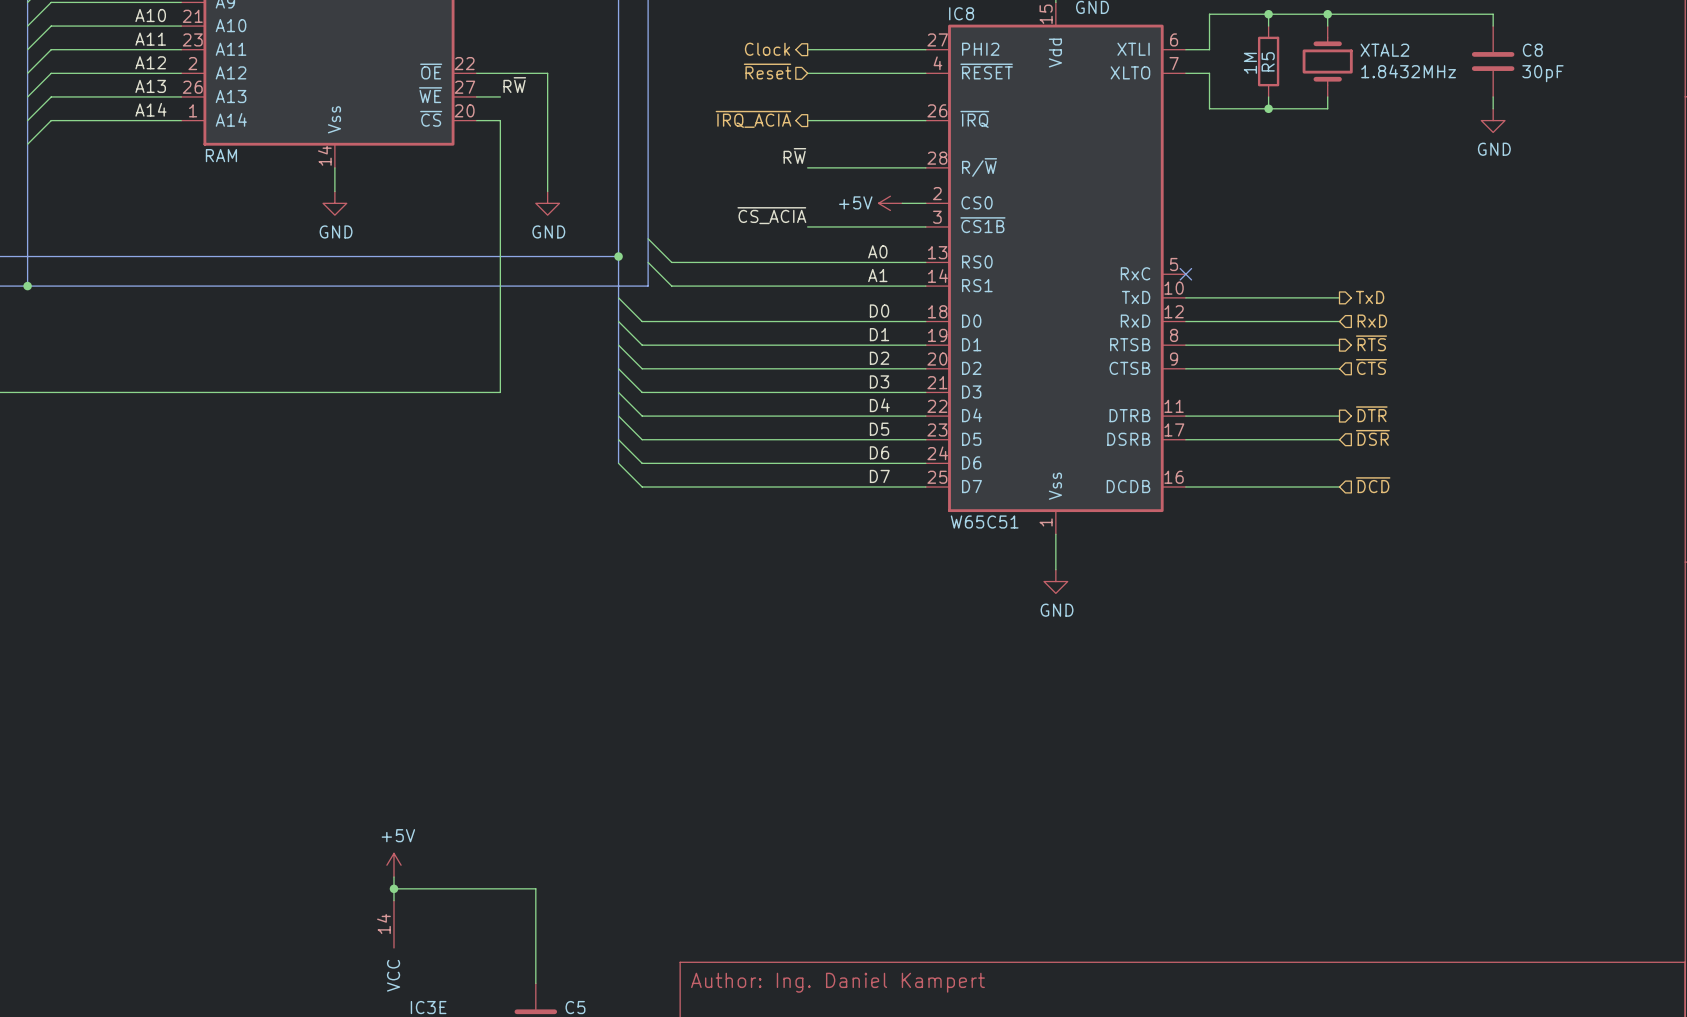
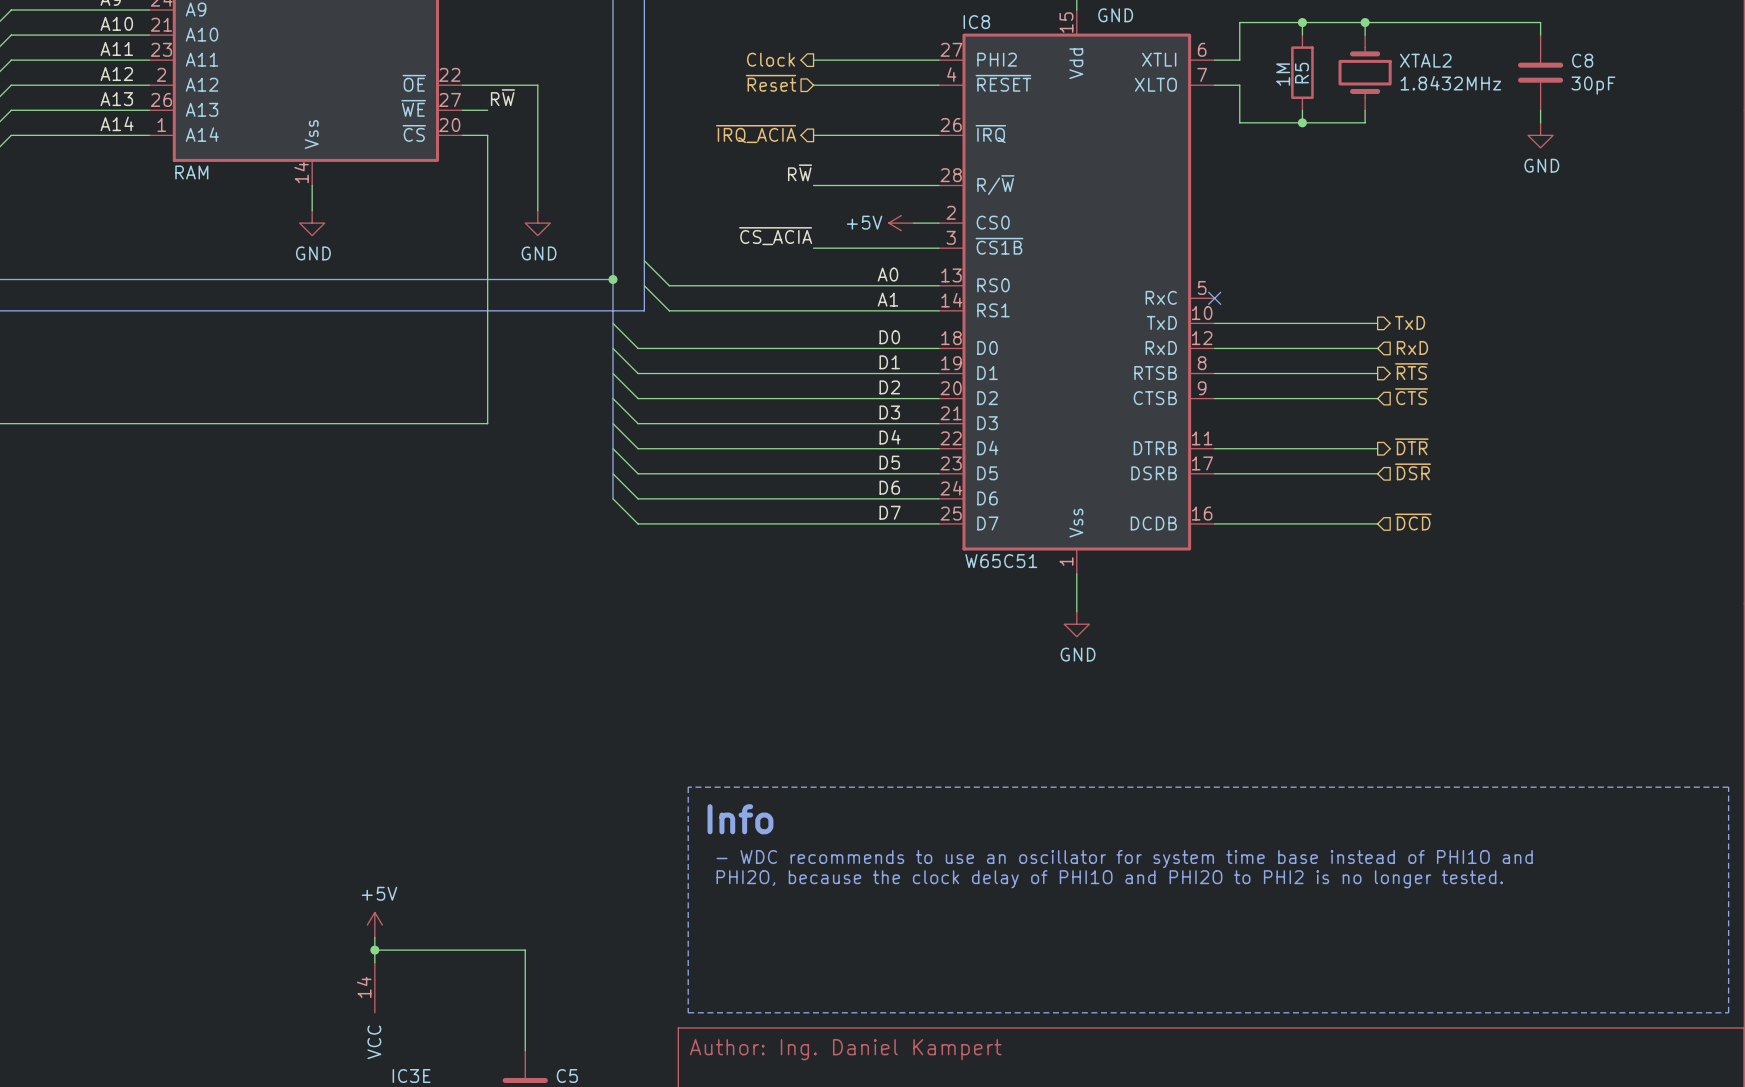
line: none -> (688, 787) (688, 1012) (1728, 1012) (1728, 787) (688, 787)
text: none -> Info (740, 819)
text: none -> - WDC recommends to use an oscillator for system time base instead of PHI1O and (1124, 859)
text: none -> PHI2O, because the clock delay of PHI1O and PHI2O to PHI2 is no longer tested. (1109, 879)

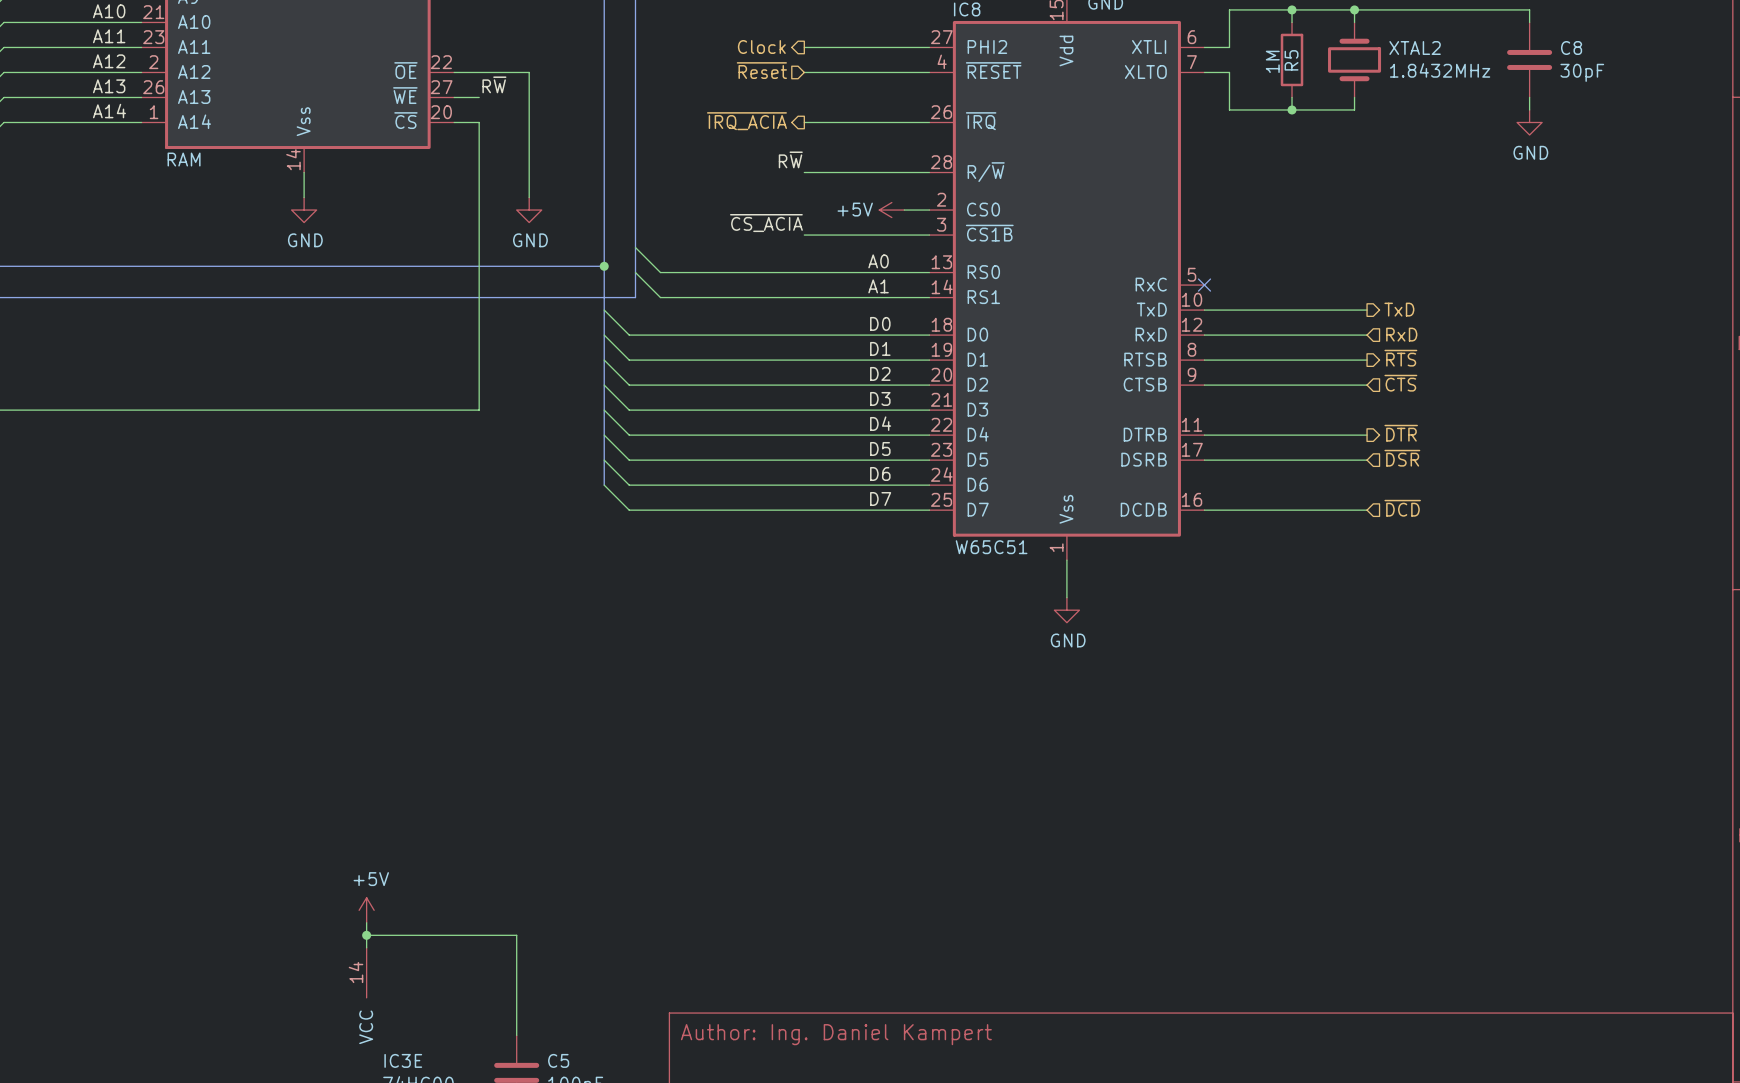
line: (688, 787) (688, 1012) (1728, 1012) (1728, 787) (688, 787) -> none
text: Info (740, 819) -> none
text: - WDC recommends to use an oscillator for system time base instead of PHI1O and (1124, 859) -> none
text: PHI2O, because the clock delay of PHI1O and PHI2O to PHI2 is no longer tested. (1109, 879) -> none

